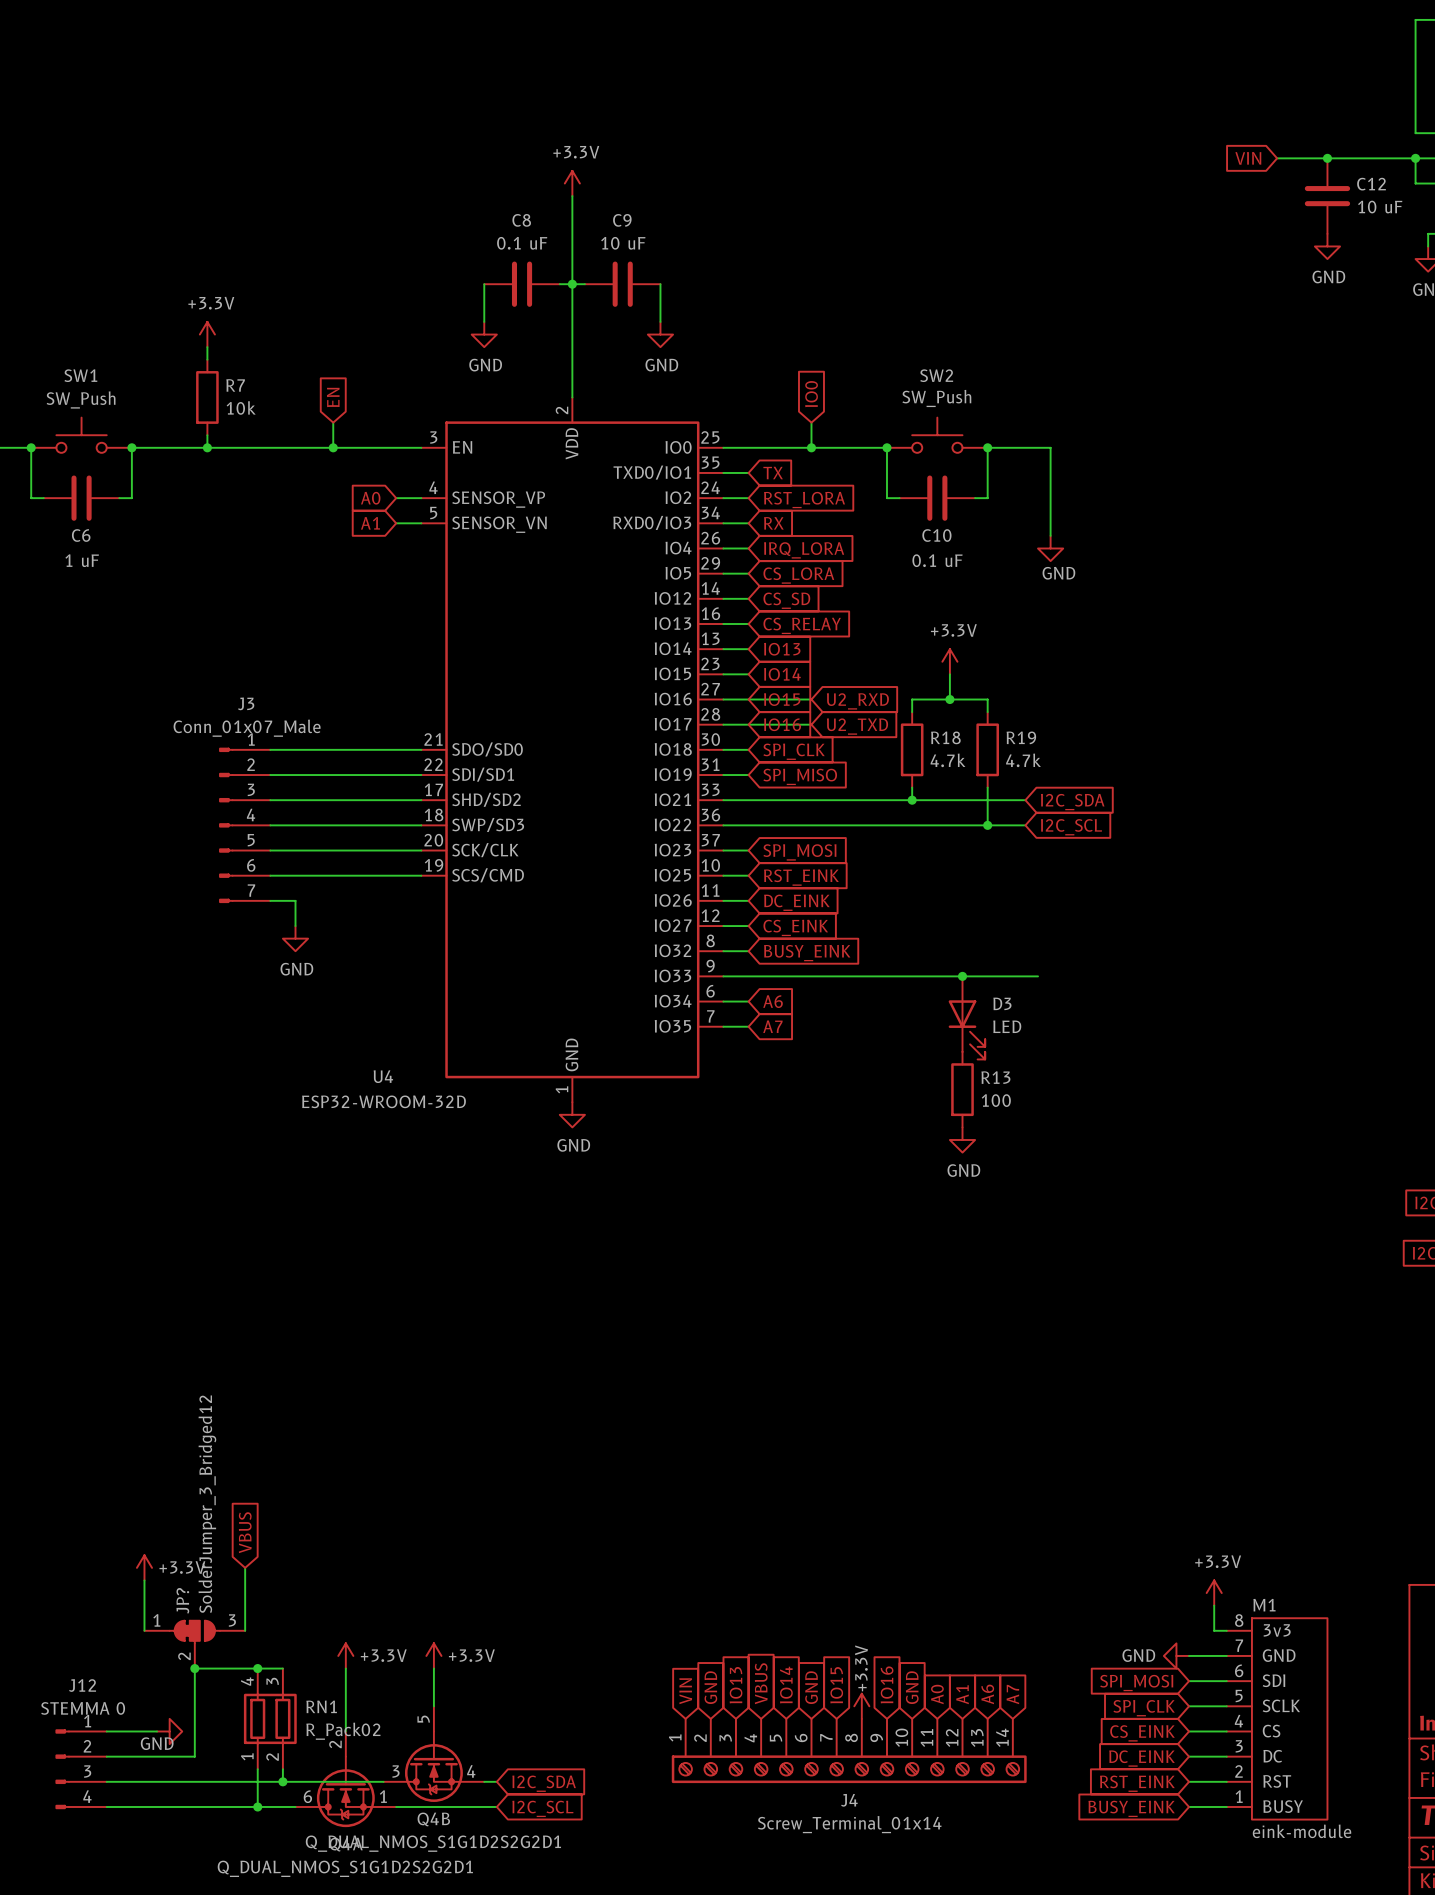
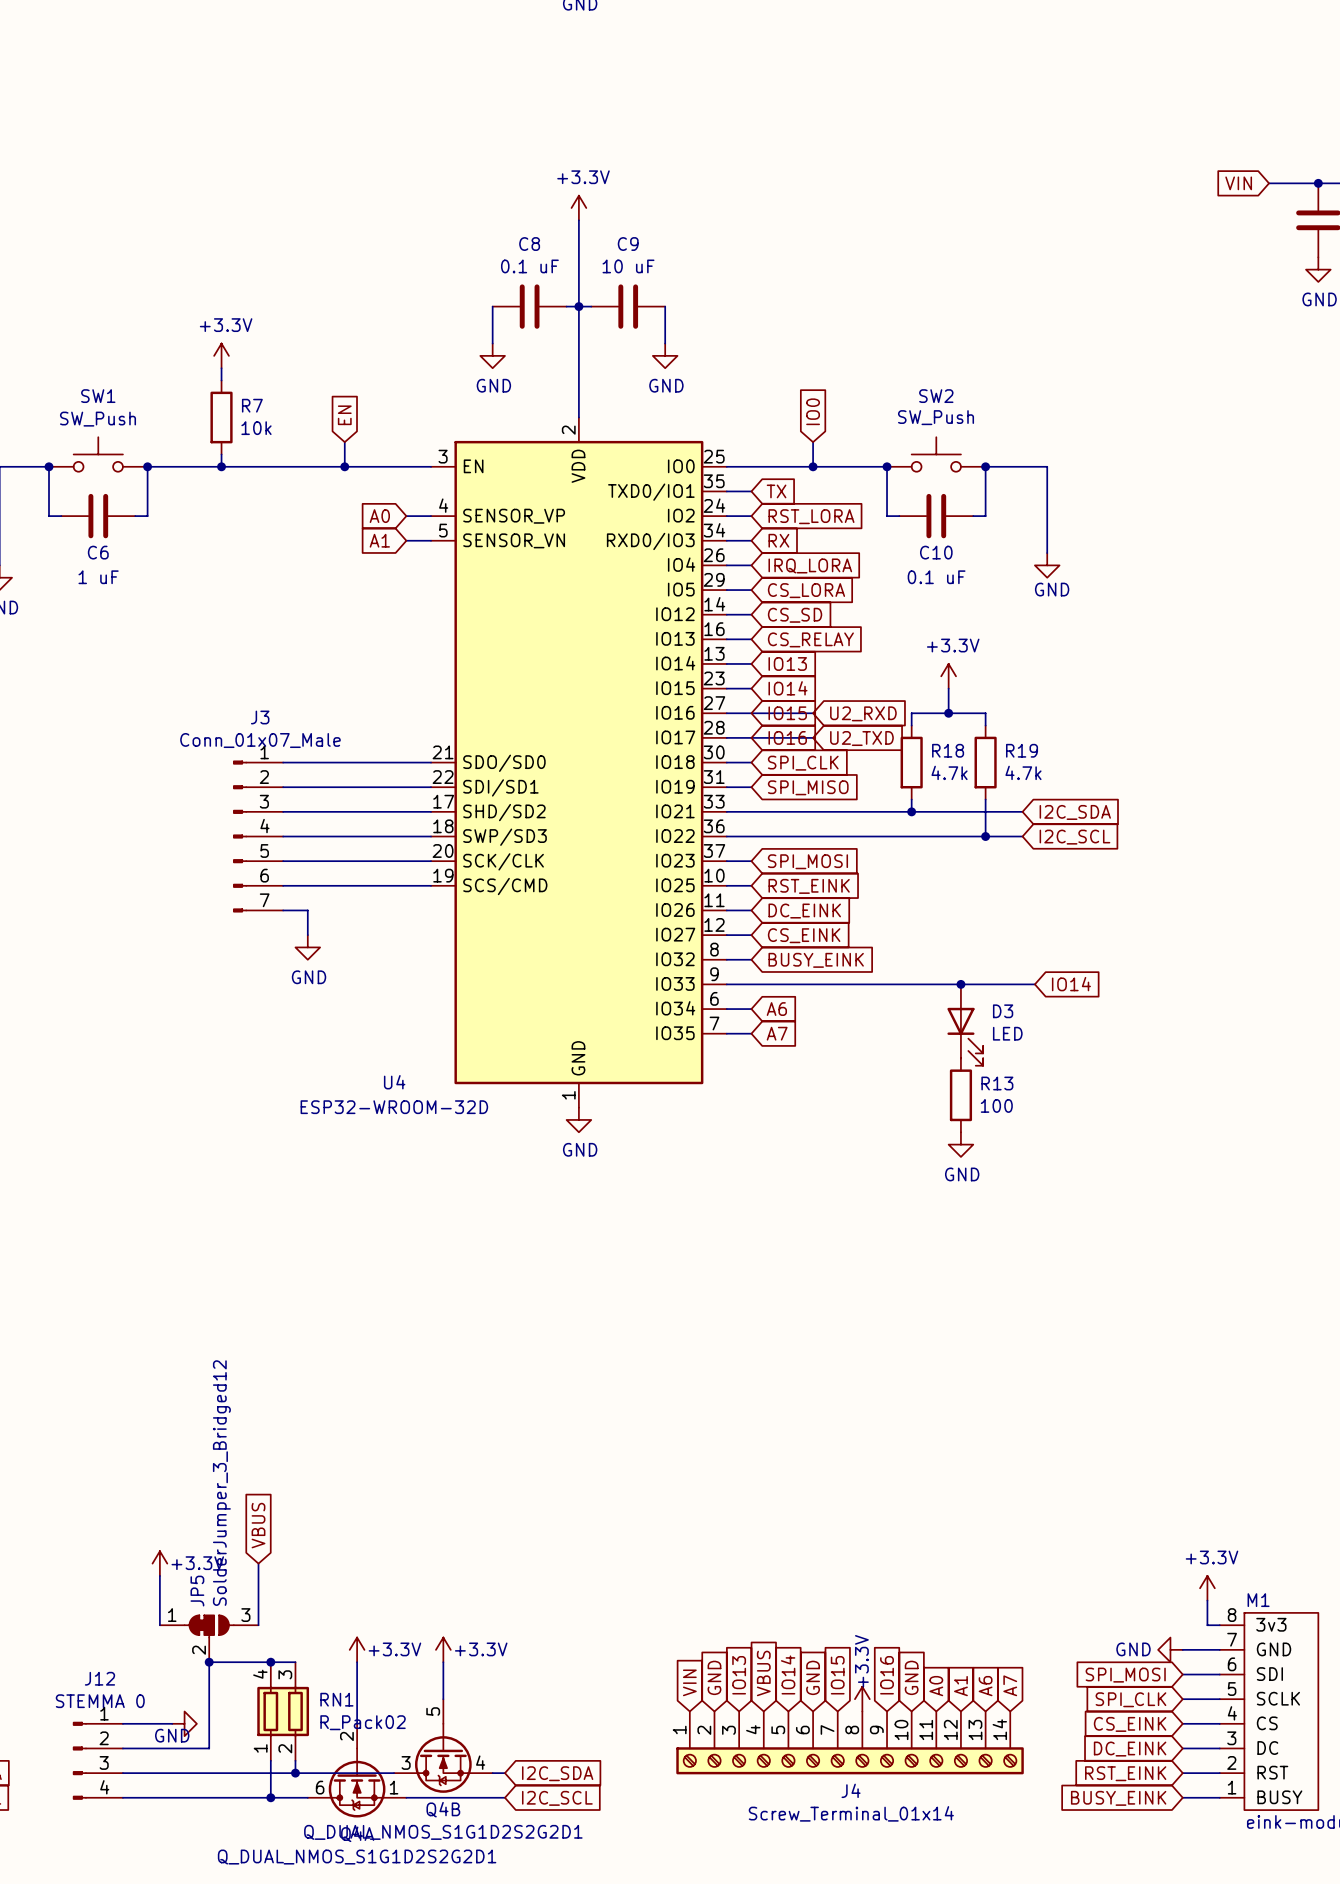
global label: none -> IO14 (1071, 984)
JP? name: JP? (182, 1600) -> JP5 (197, 1591)

